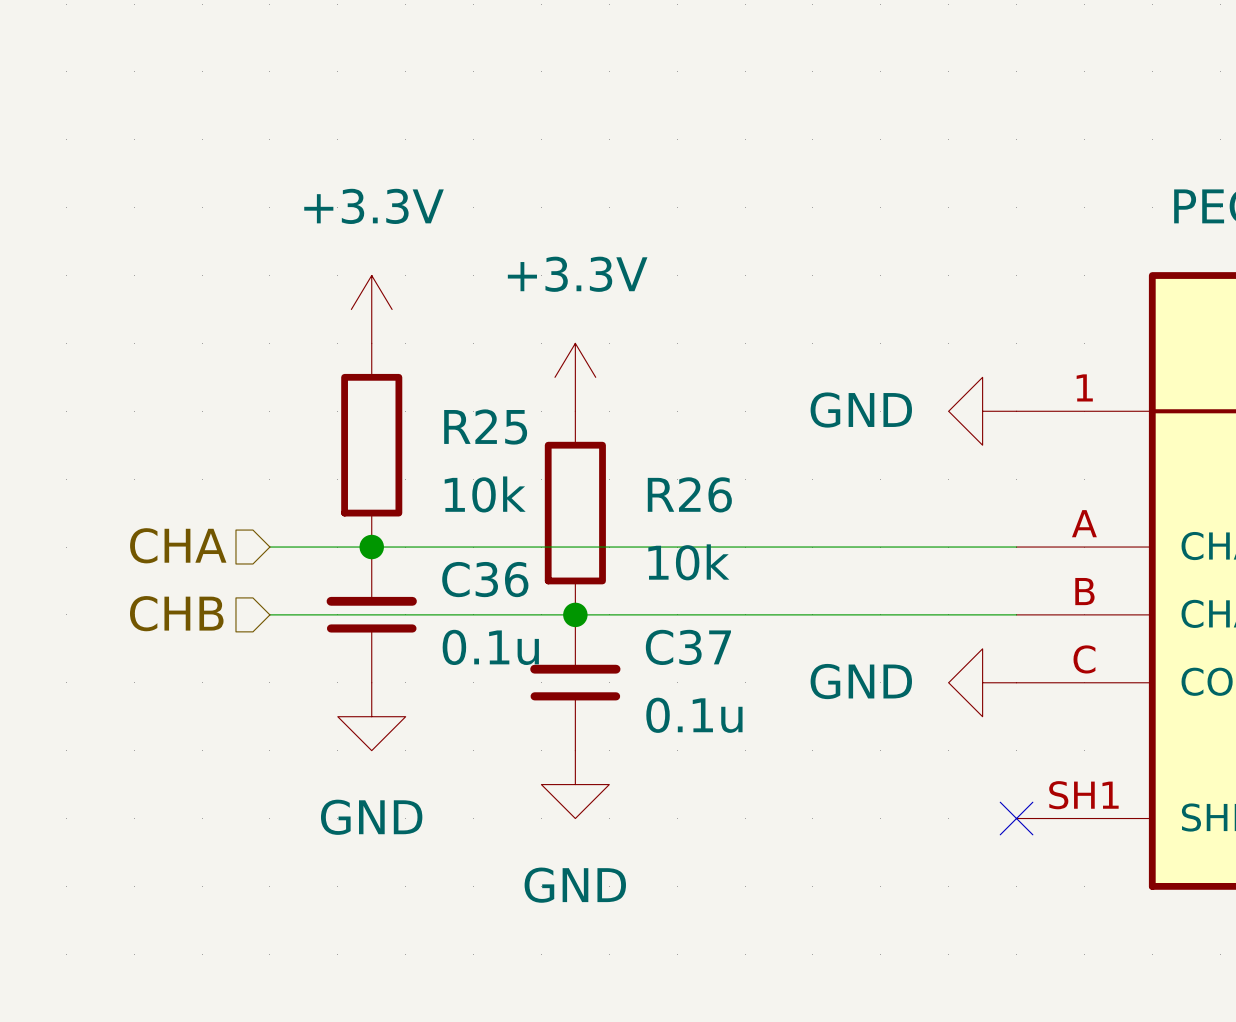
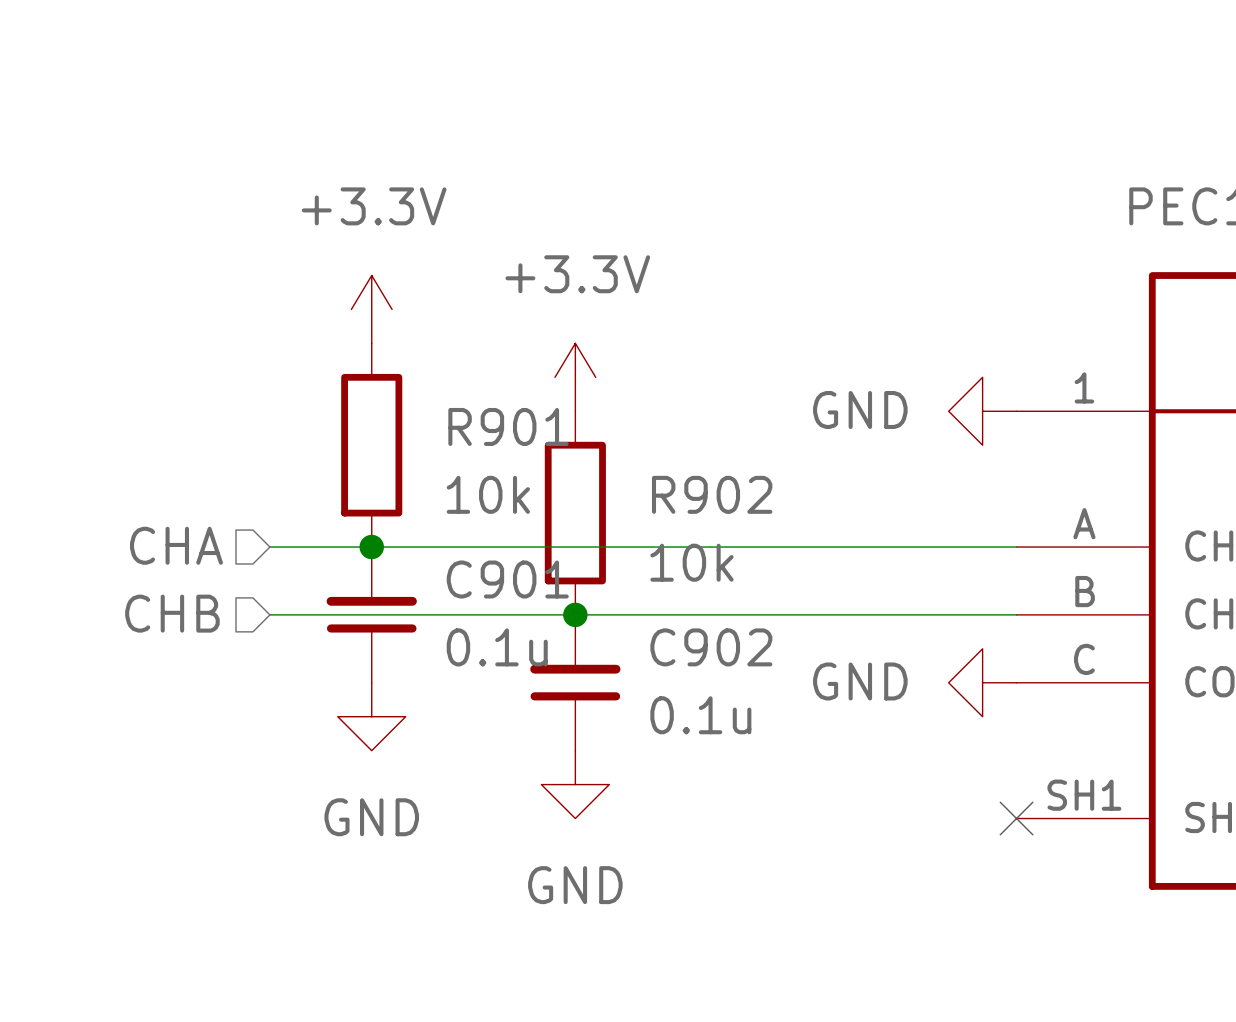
R25 name: R25 (485, 426) -> R901 (508, 426)
R26 name: R26 (689, 494) -> R902 (712, 494)
C36 name: C36 (485, 579) -> C901 (507, 579)
C37 name: C37 (688, 647) -> C902 (711, 647)

